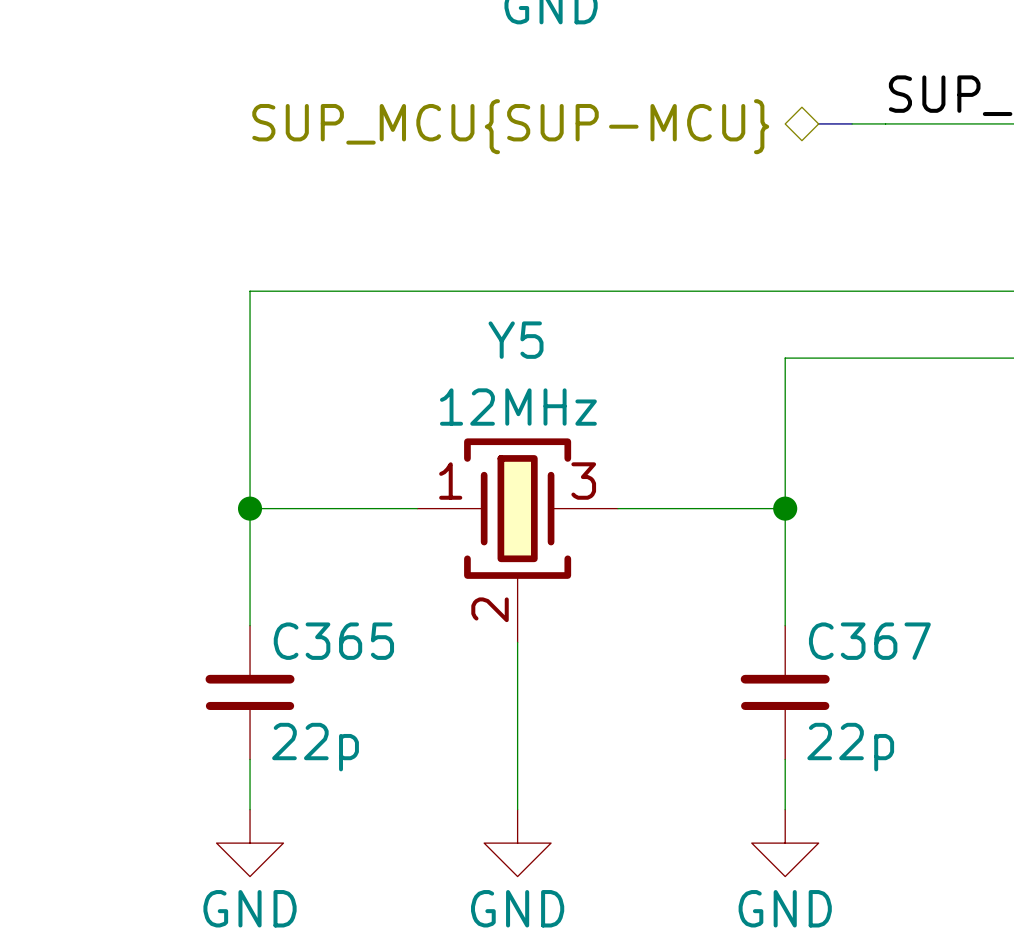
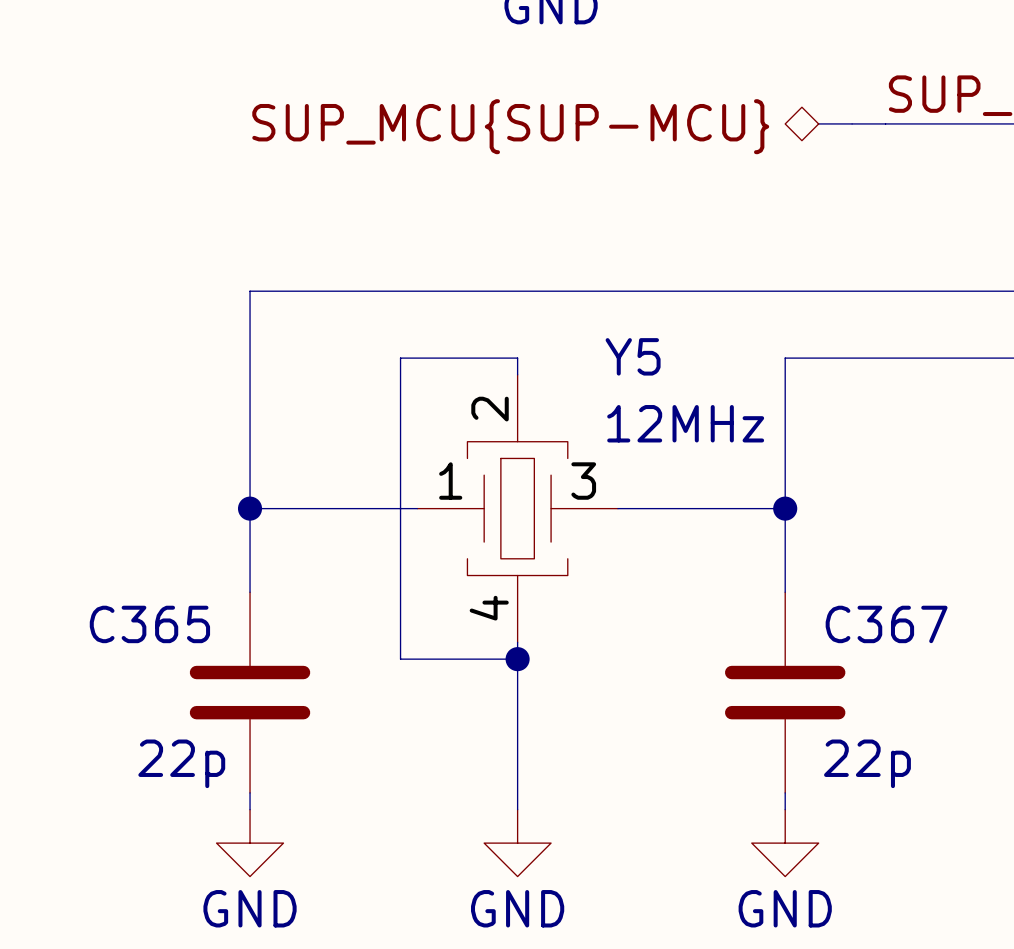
Y5 name position: Y5 (516, 340) -> Y5 (633, 356)
wire: none -> (517, 374) (517, 358) (400, 358) (400, 659) (517, 659)
Y5 text position: 12MHz (518, 407) -> 12MHz (685, 423)
Y5 symbol: [417, 438, 618, 643] -> [417, 374, 618, 643]
C365 symbol: [205, 625, 295, 760] -> [189, 592, 311, 793]
C367 symbol: [740, 625, 830, 760] -> [725, 592, 846, 793]
C365 name position: C365 (333, 641) -> C365 (149, 624)
junction: none -> (517, 659)
C365 text position: 22p (315, 747) -> 22p (181, 763)

